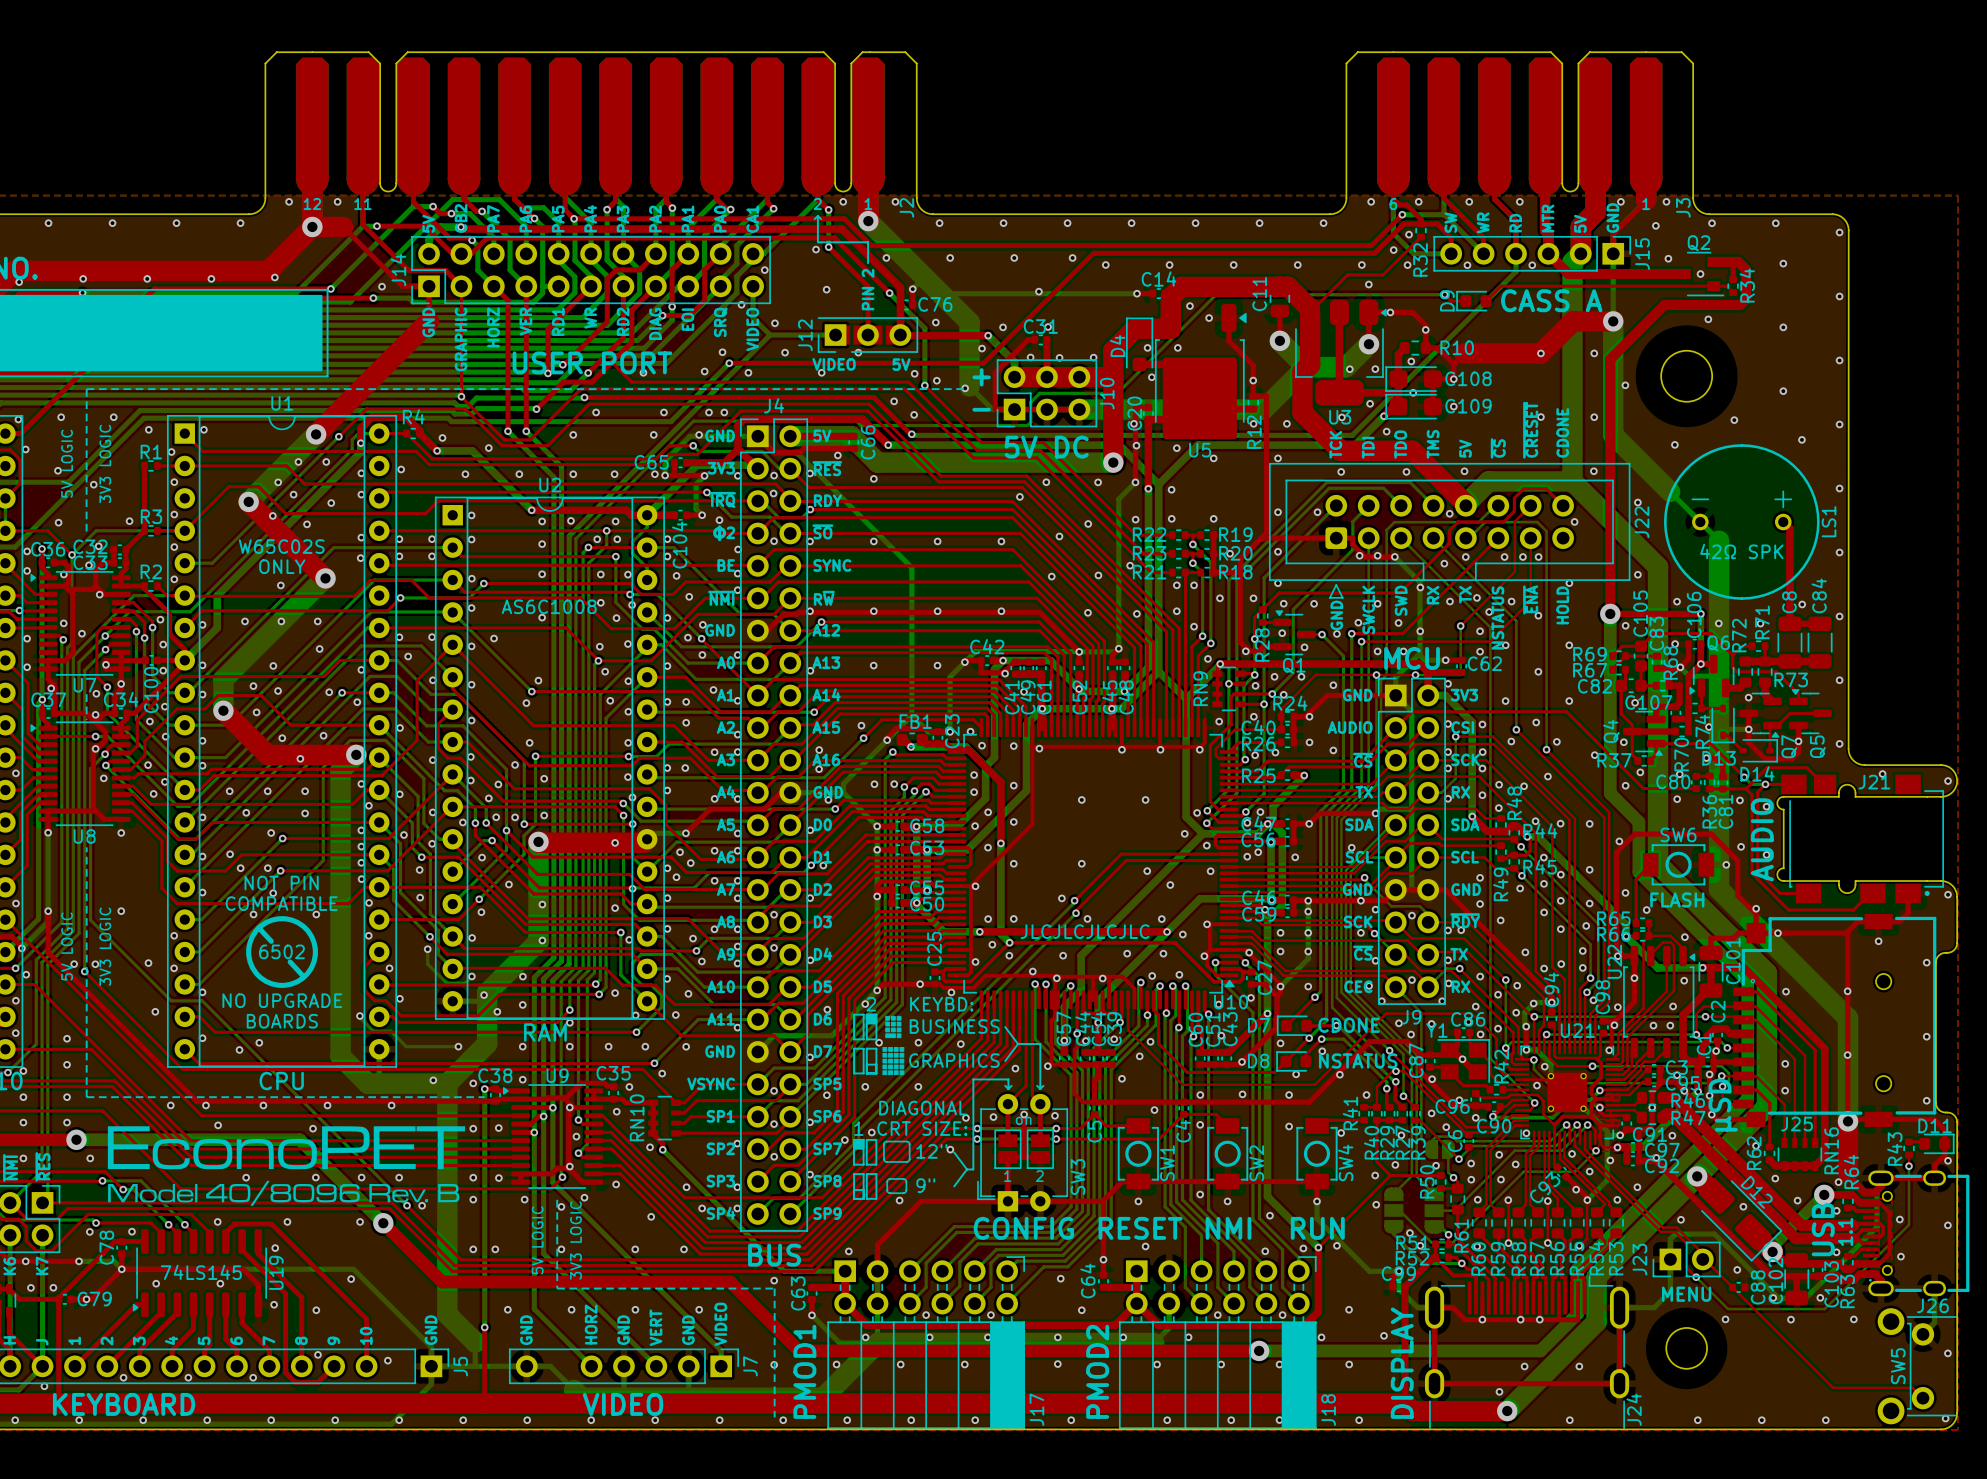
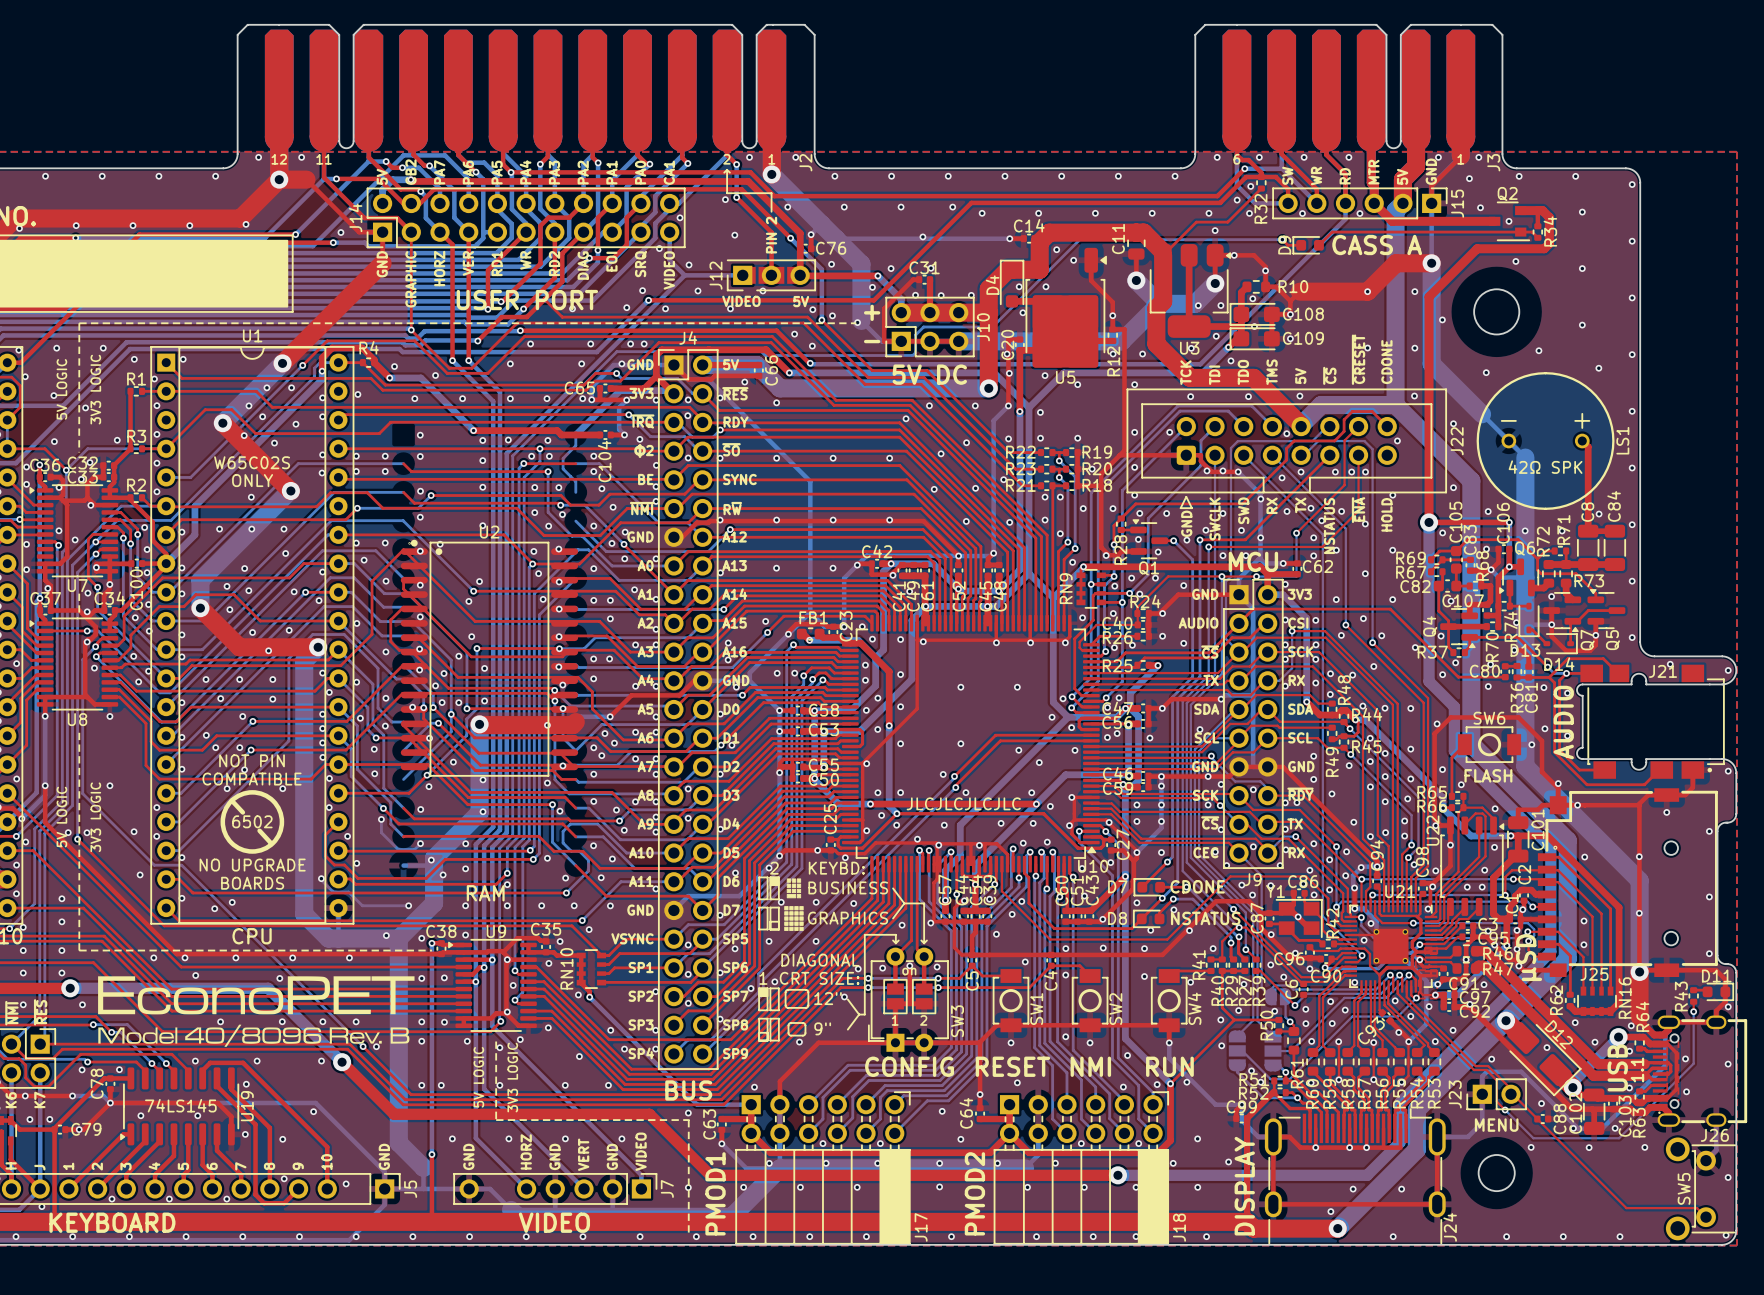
U2 name position: U2 (550, 485) -> U2 (489, 532)
U2 footprint: [434, 496, 665, 1020] -> [400, 539, 579, 777]
U2 value: AS6C1008 (549, 606) -> none

